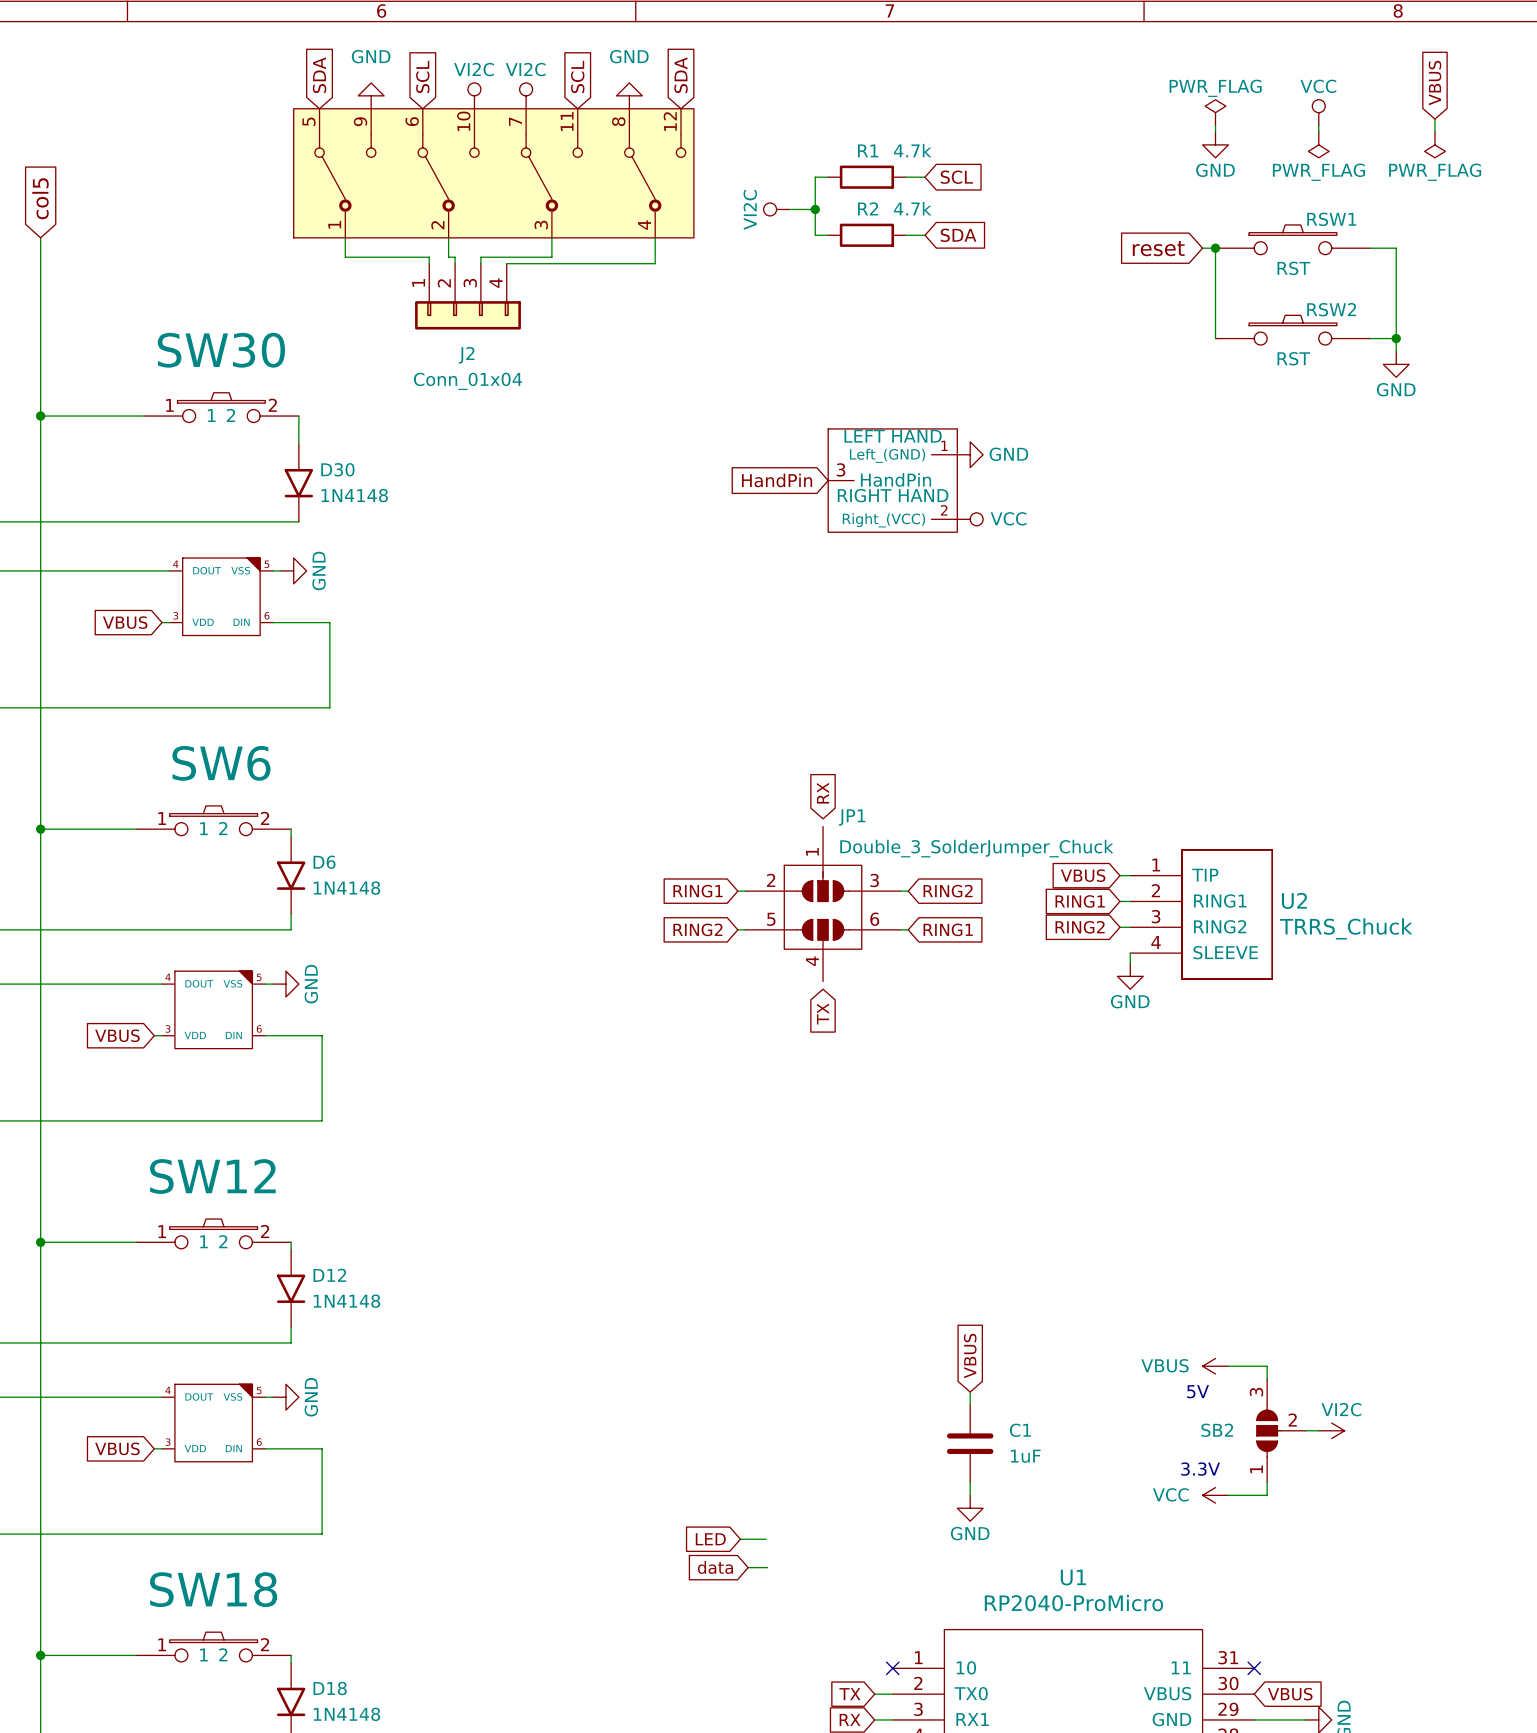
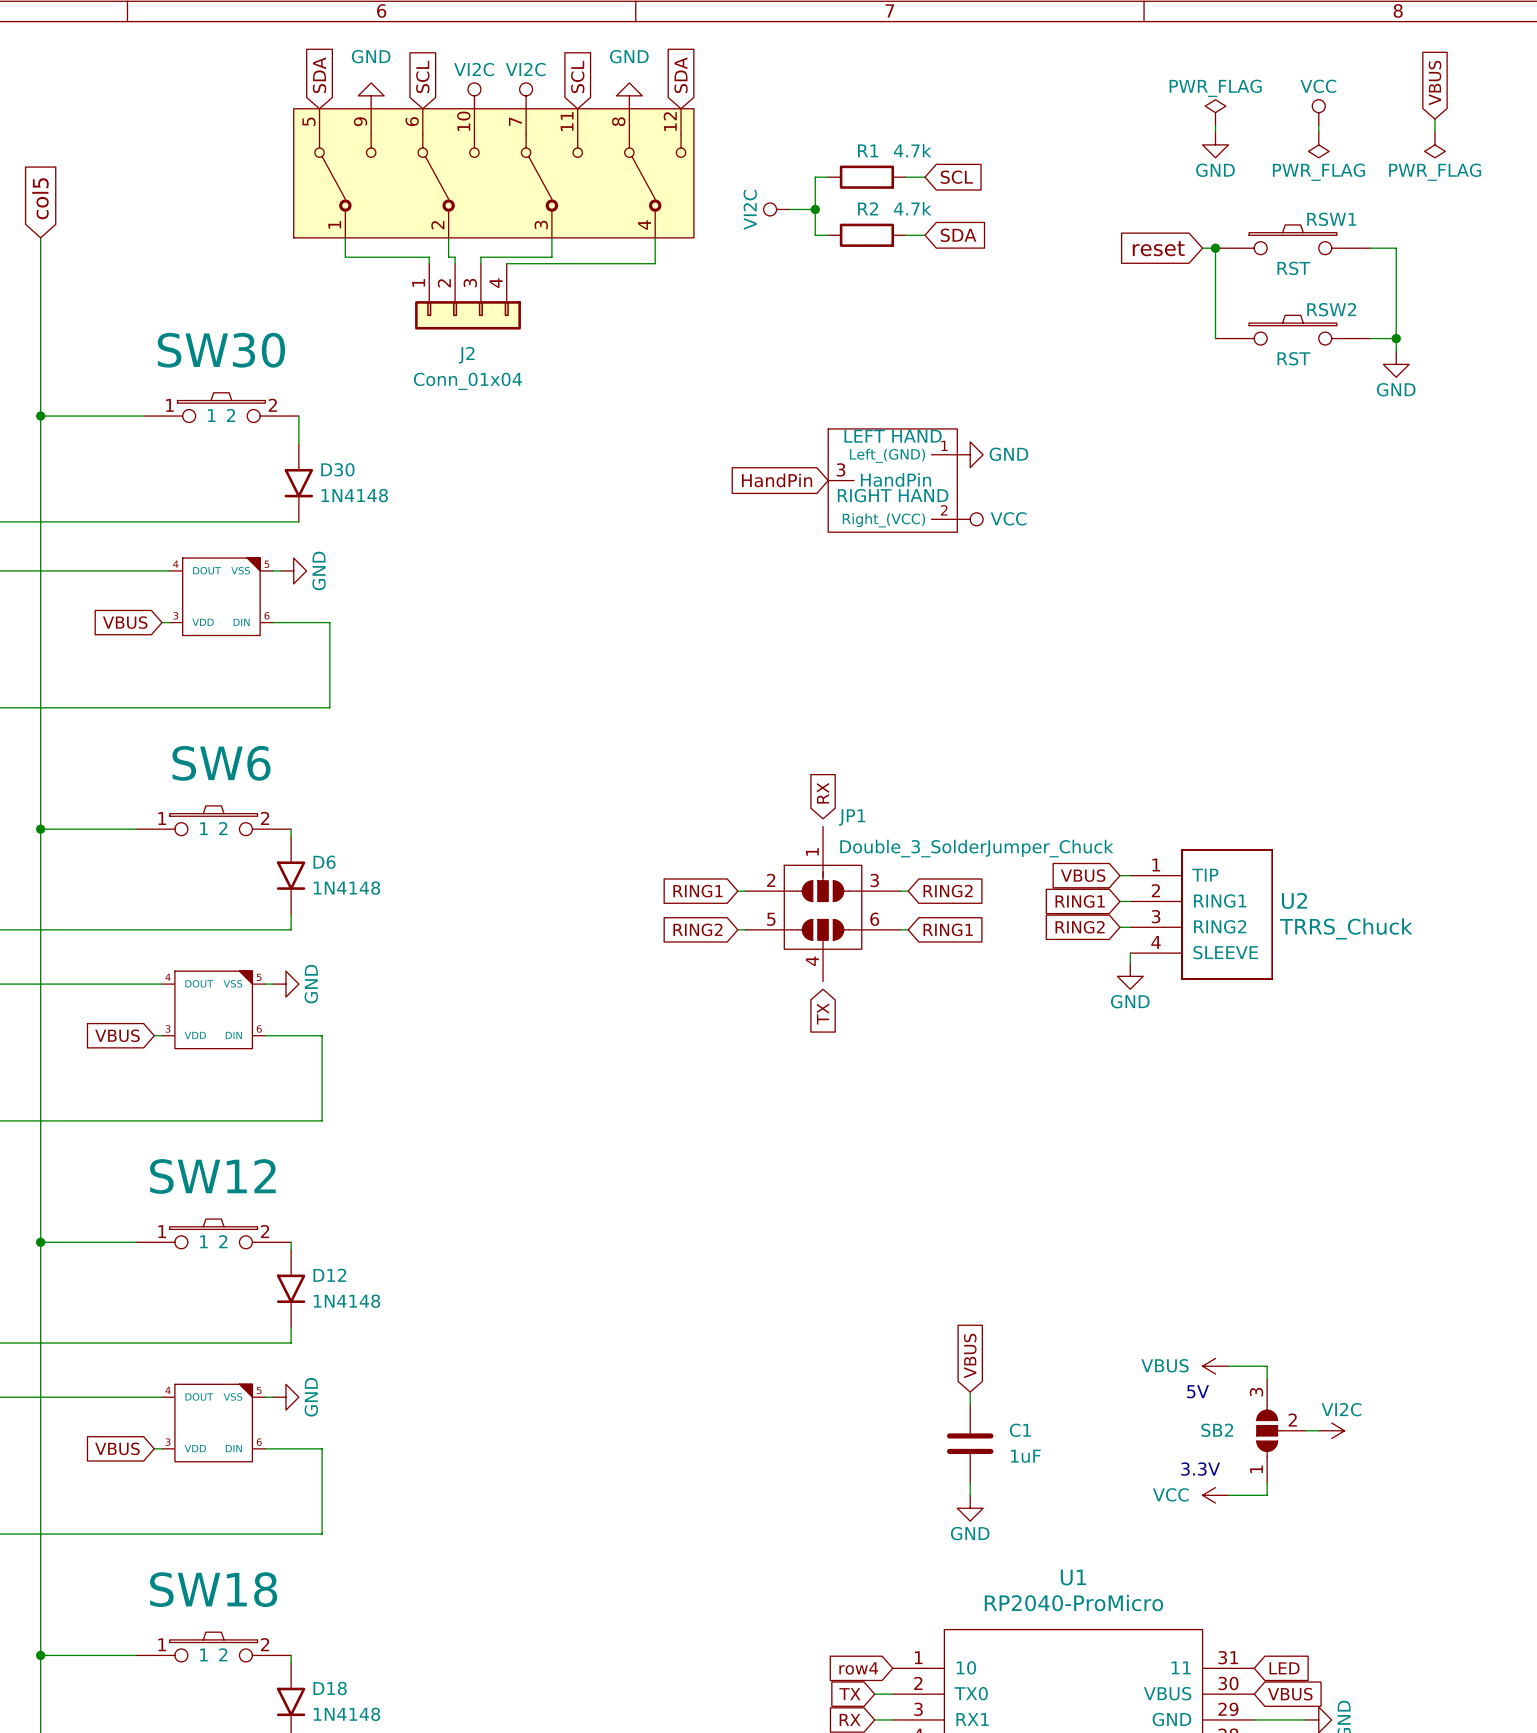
global label: LED (710, 1539) -> none
wire: (740, 1539) (766, 1539) -> none
global label: data (715, 1567) -> none
wire: (748, 1567) (767, 1567) -> none
global label: none -> row4 (858, 1668)
no-connect mark: (892, 1668) -> none
no-connect mark: (1254, 1668) -> none
global label: none -> LED (1284, 1668)

